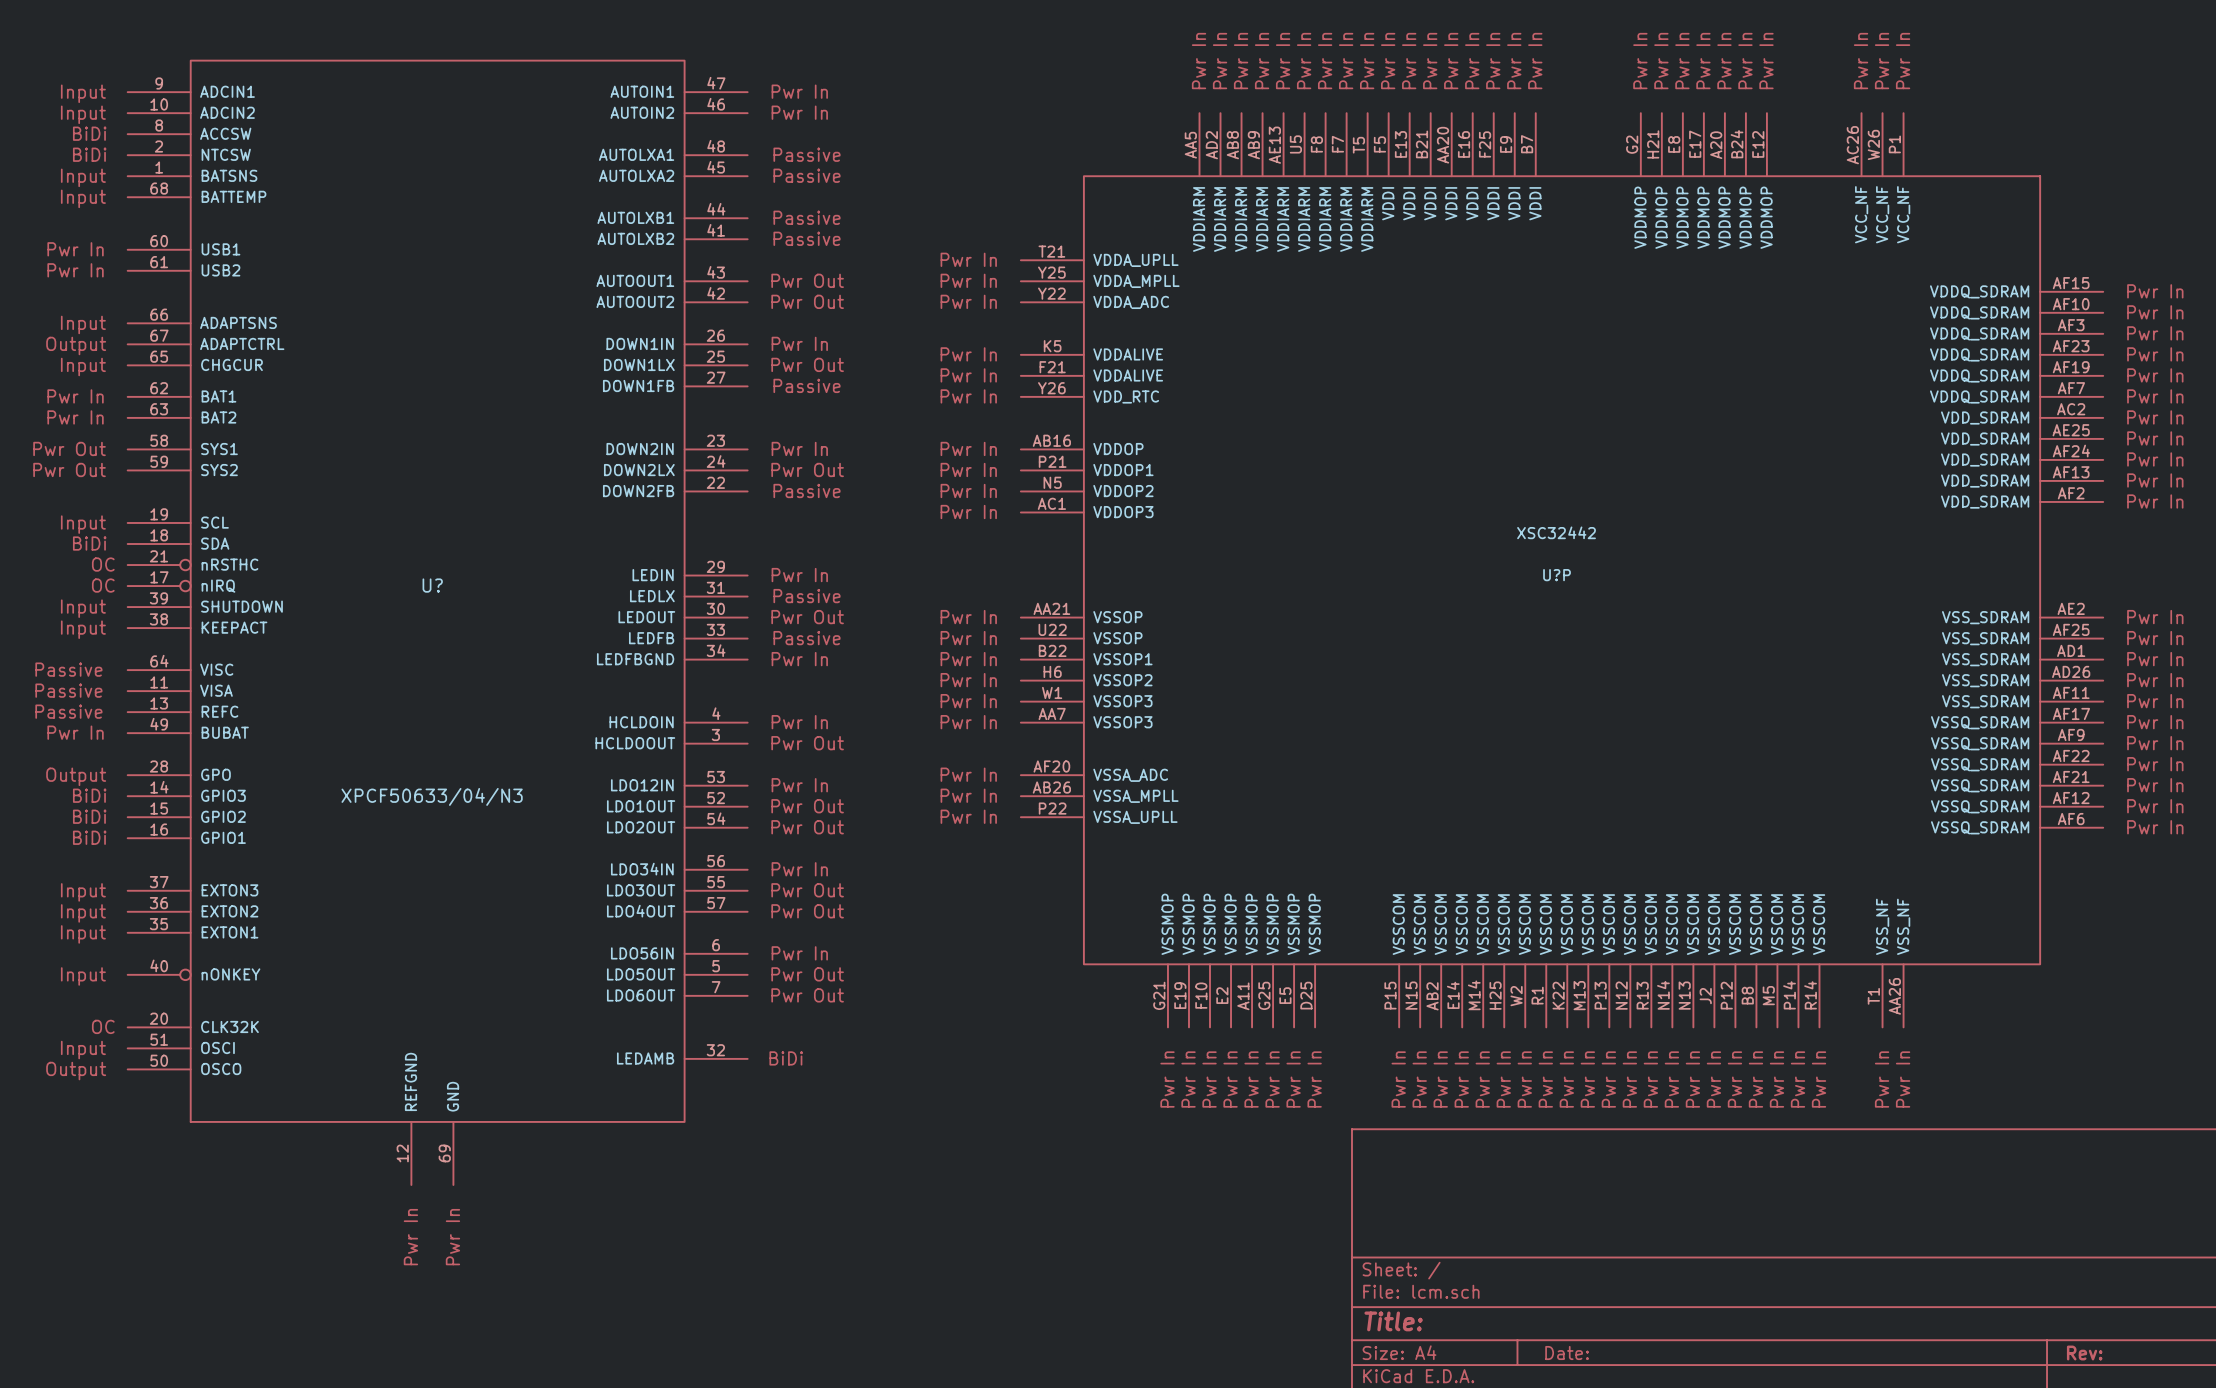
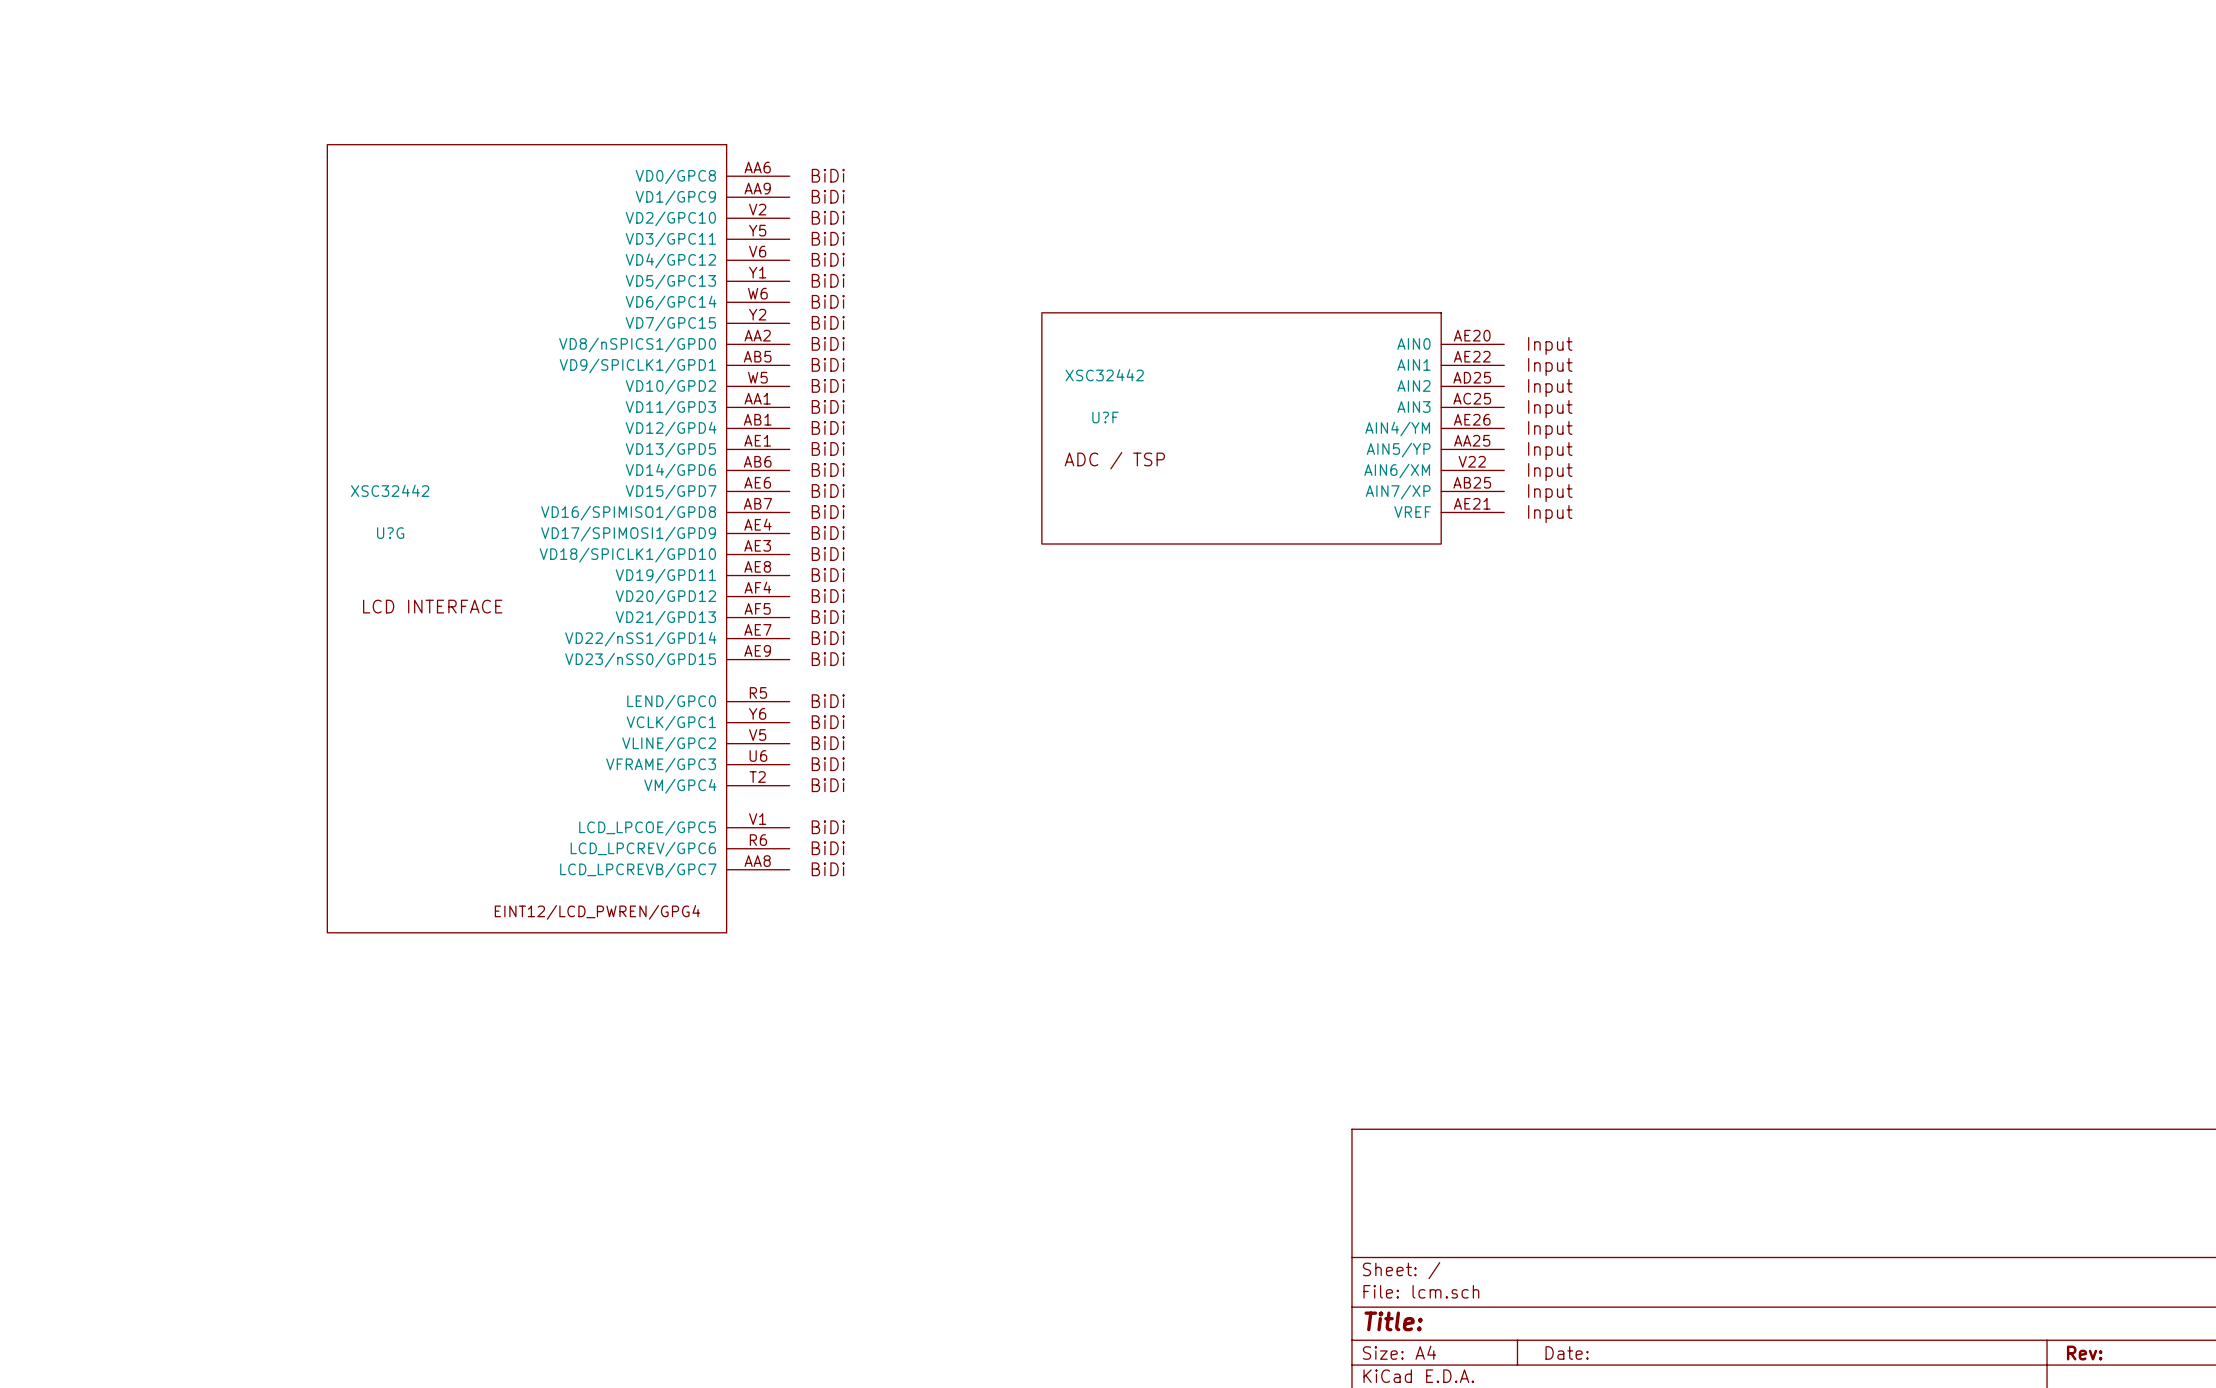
U?F: none -> XSC32442 (1273, 428)
U?G: none -> XSC32442 (558, 538)
U?P: XSC32442 (1562, 570) -> none
U?: XPCF50633/04/N3 (437, 622) -> none

